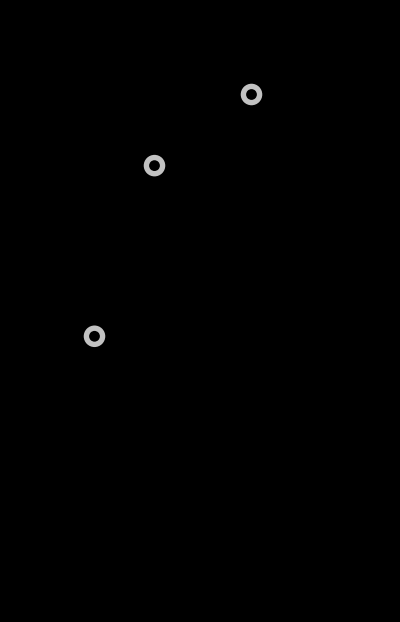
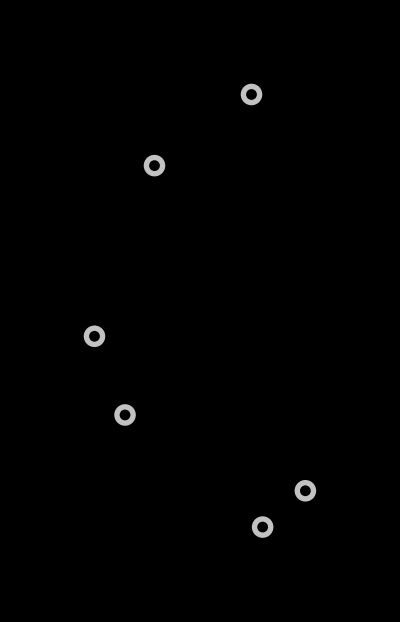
via: none -> (125, 414)
via: none -> (305, 490)
via: none -> (262, 527)

